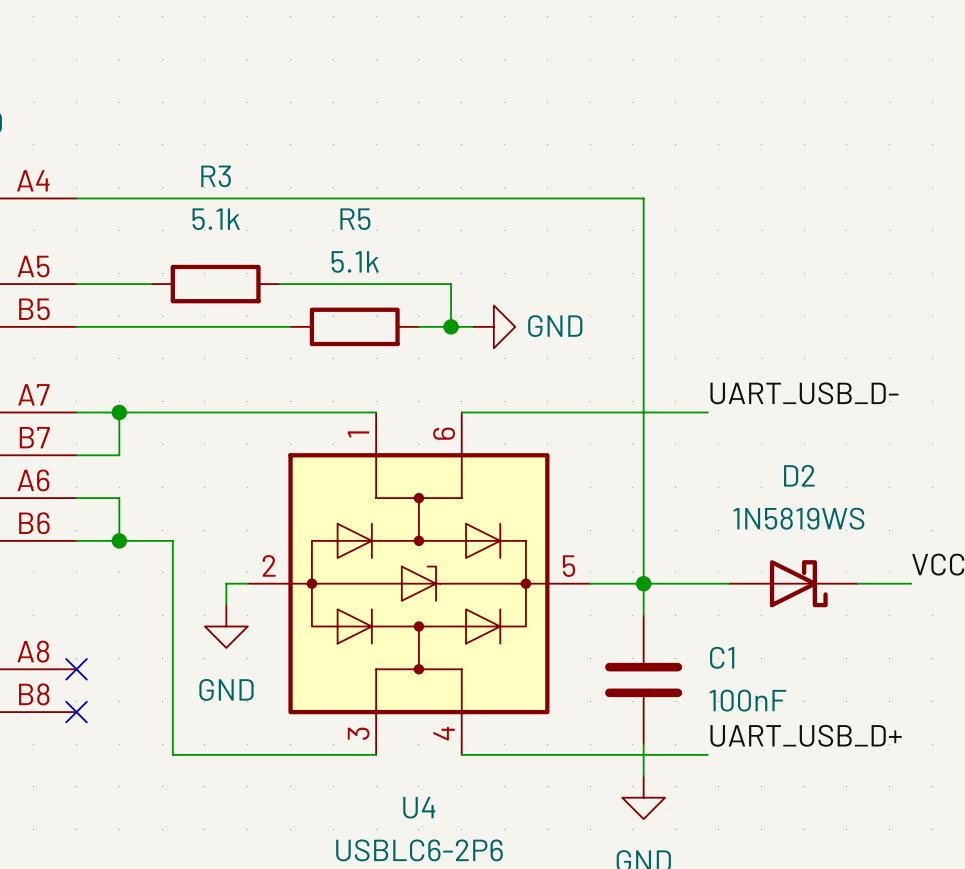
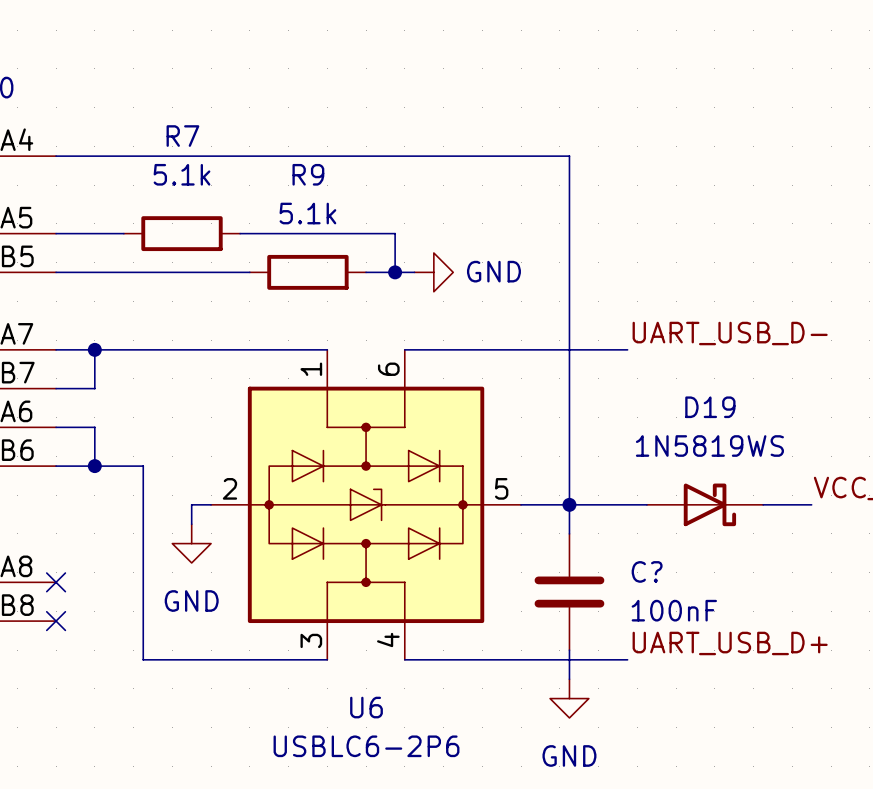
R3 name: R3 (216, 176) -> R7 (182, 136)
R5 name: R5 (355, 219) -> R9 (308, 174)
D2 name: D2 (799, 475) -> D19 (710, 407)
C1 name: C1 (722, 657) -> C? (647, 571)
U4 name: U4 (419, 807) -> U6 (366, 707)

